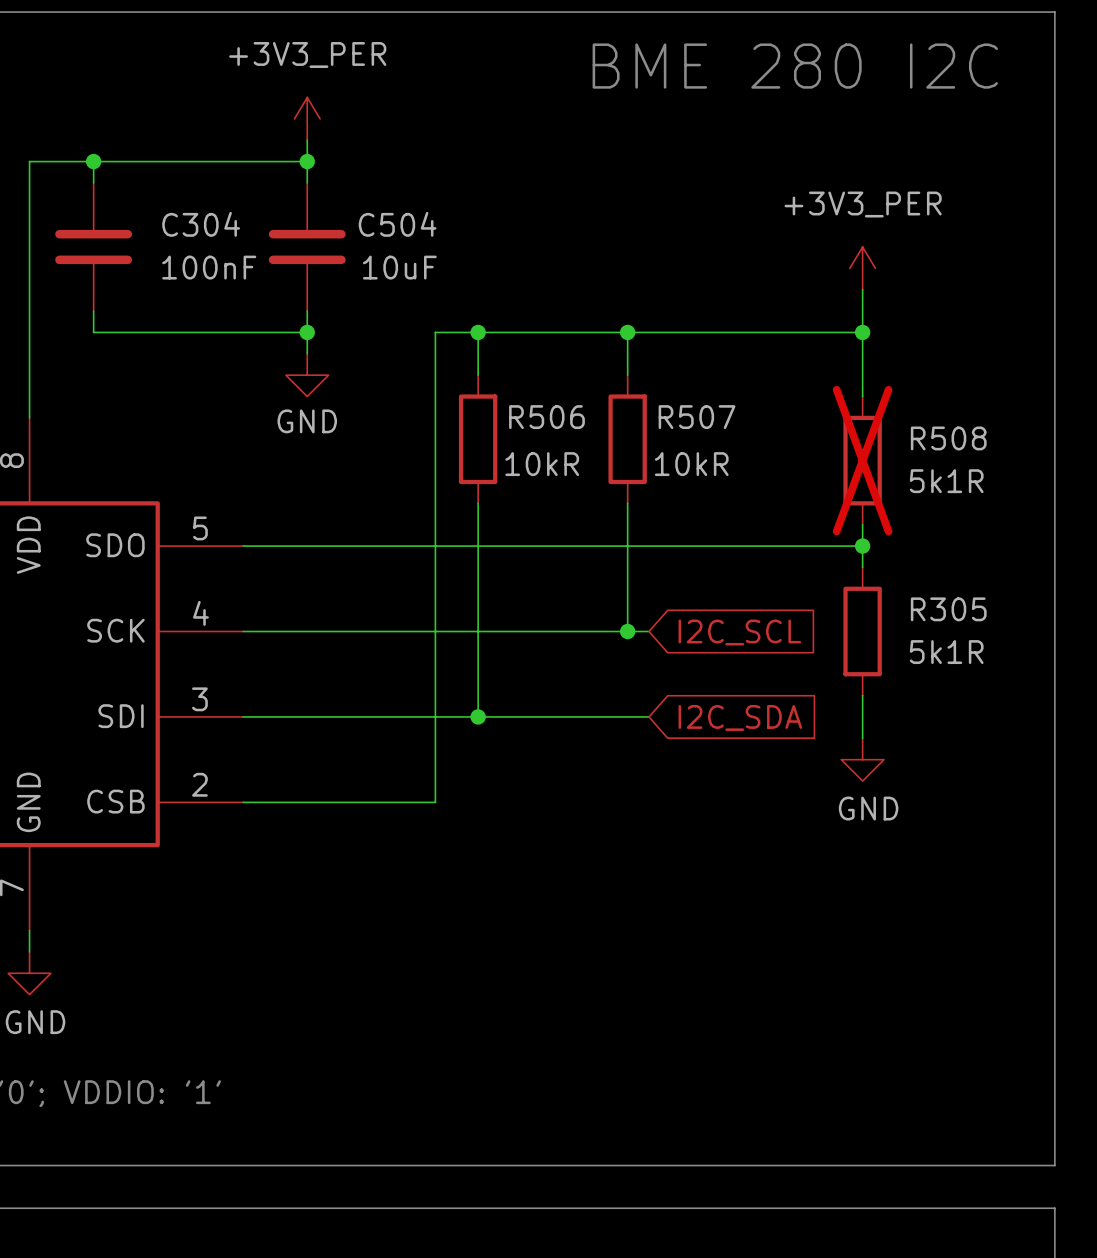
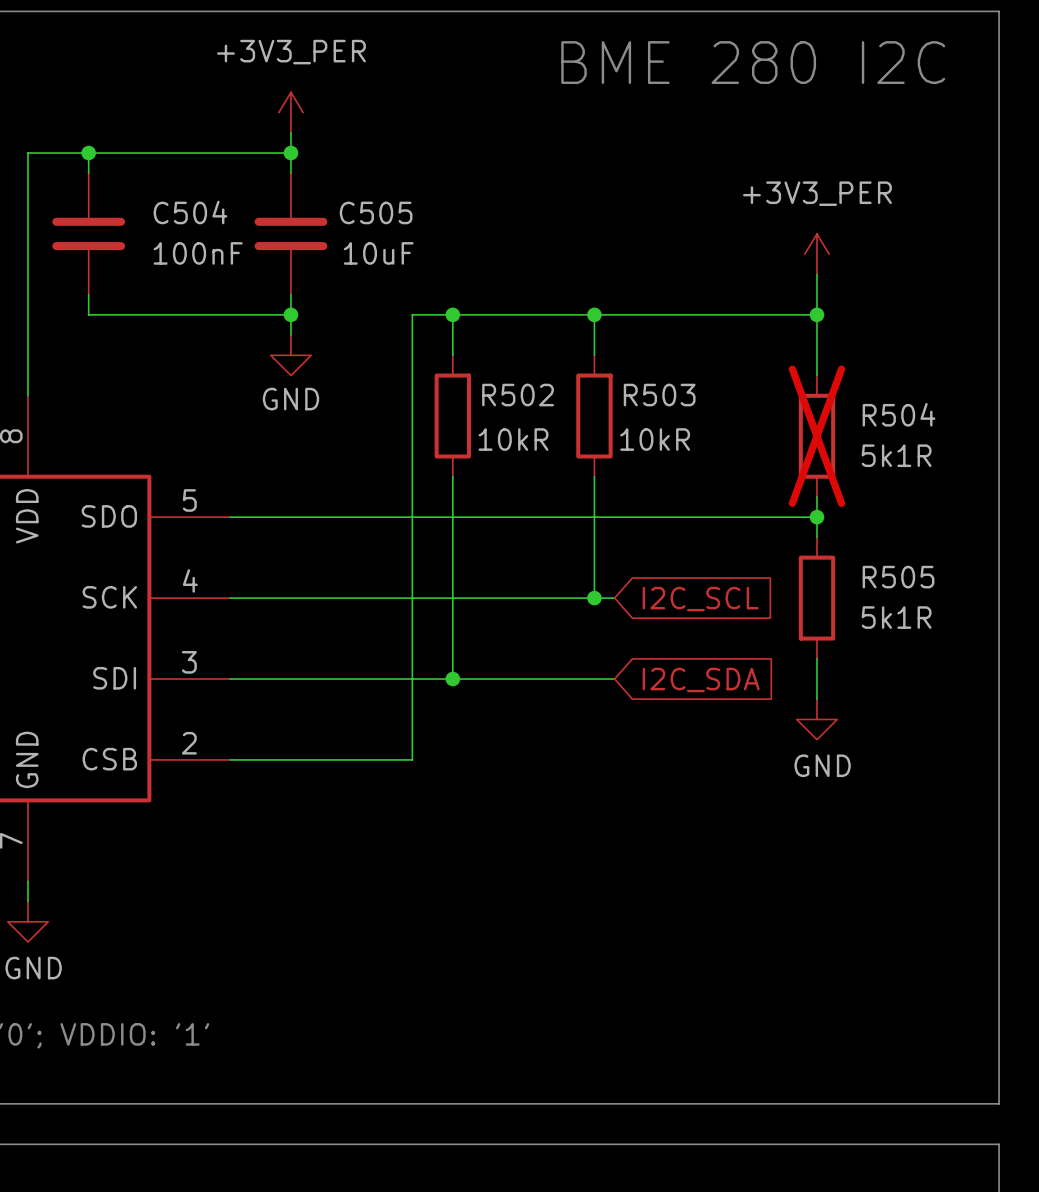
C304 name: C304 (201, 224) -> C504 (190, 212)
C504 name: C504 (397, 224) -> C505 (376, 212)
R506 name: R506 (546, 417) -> R502 (518, 395)
R507 name: R507 (697, 417) -> R503 (659, 395)
R508 name: R508 (948, 438) -> R504 (899, 414)
R305 name: R305 (948, 609) -> R505 (898, 577)

